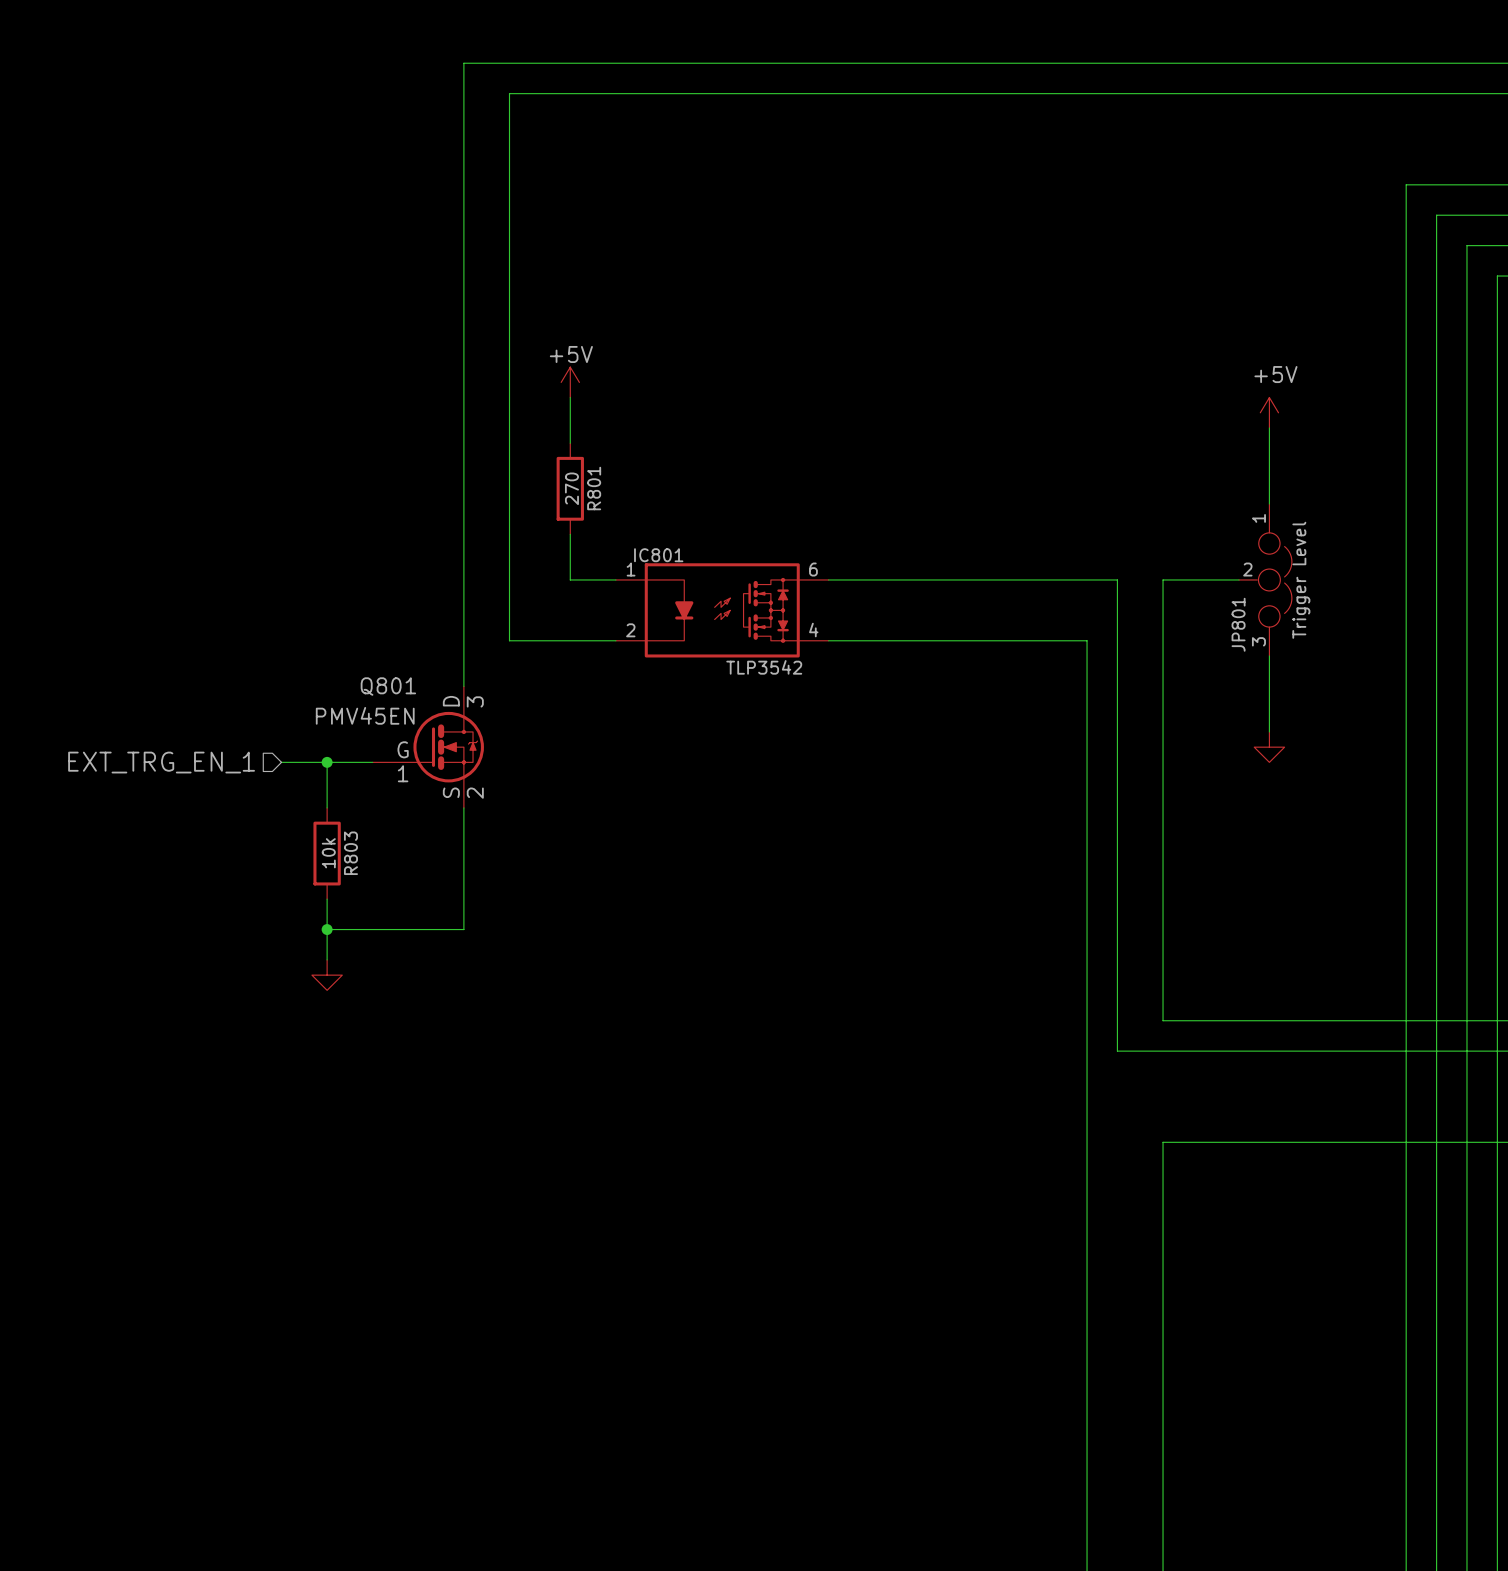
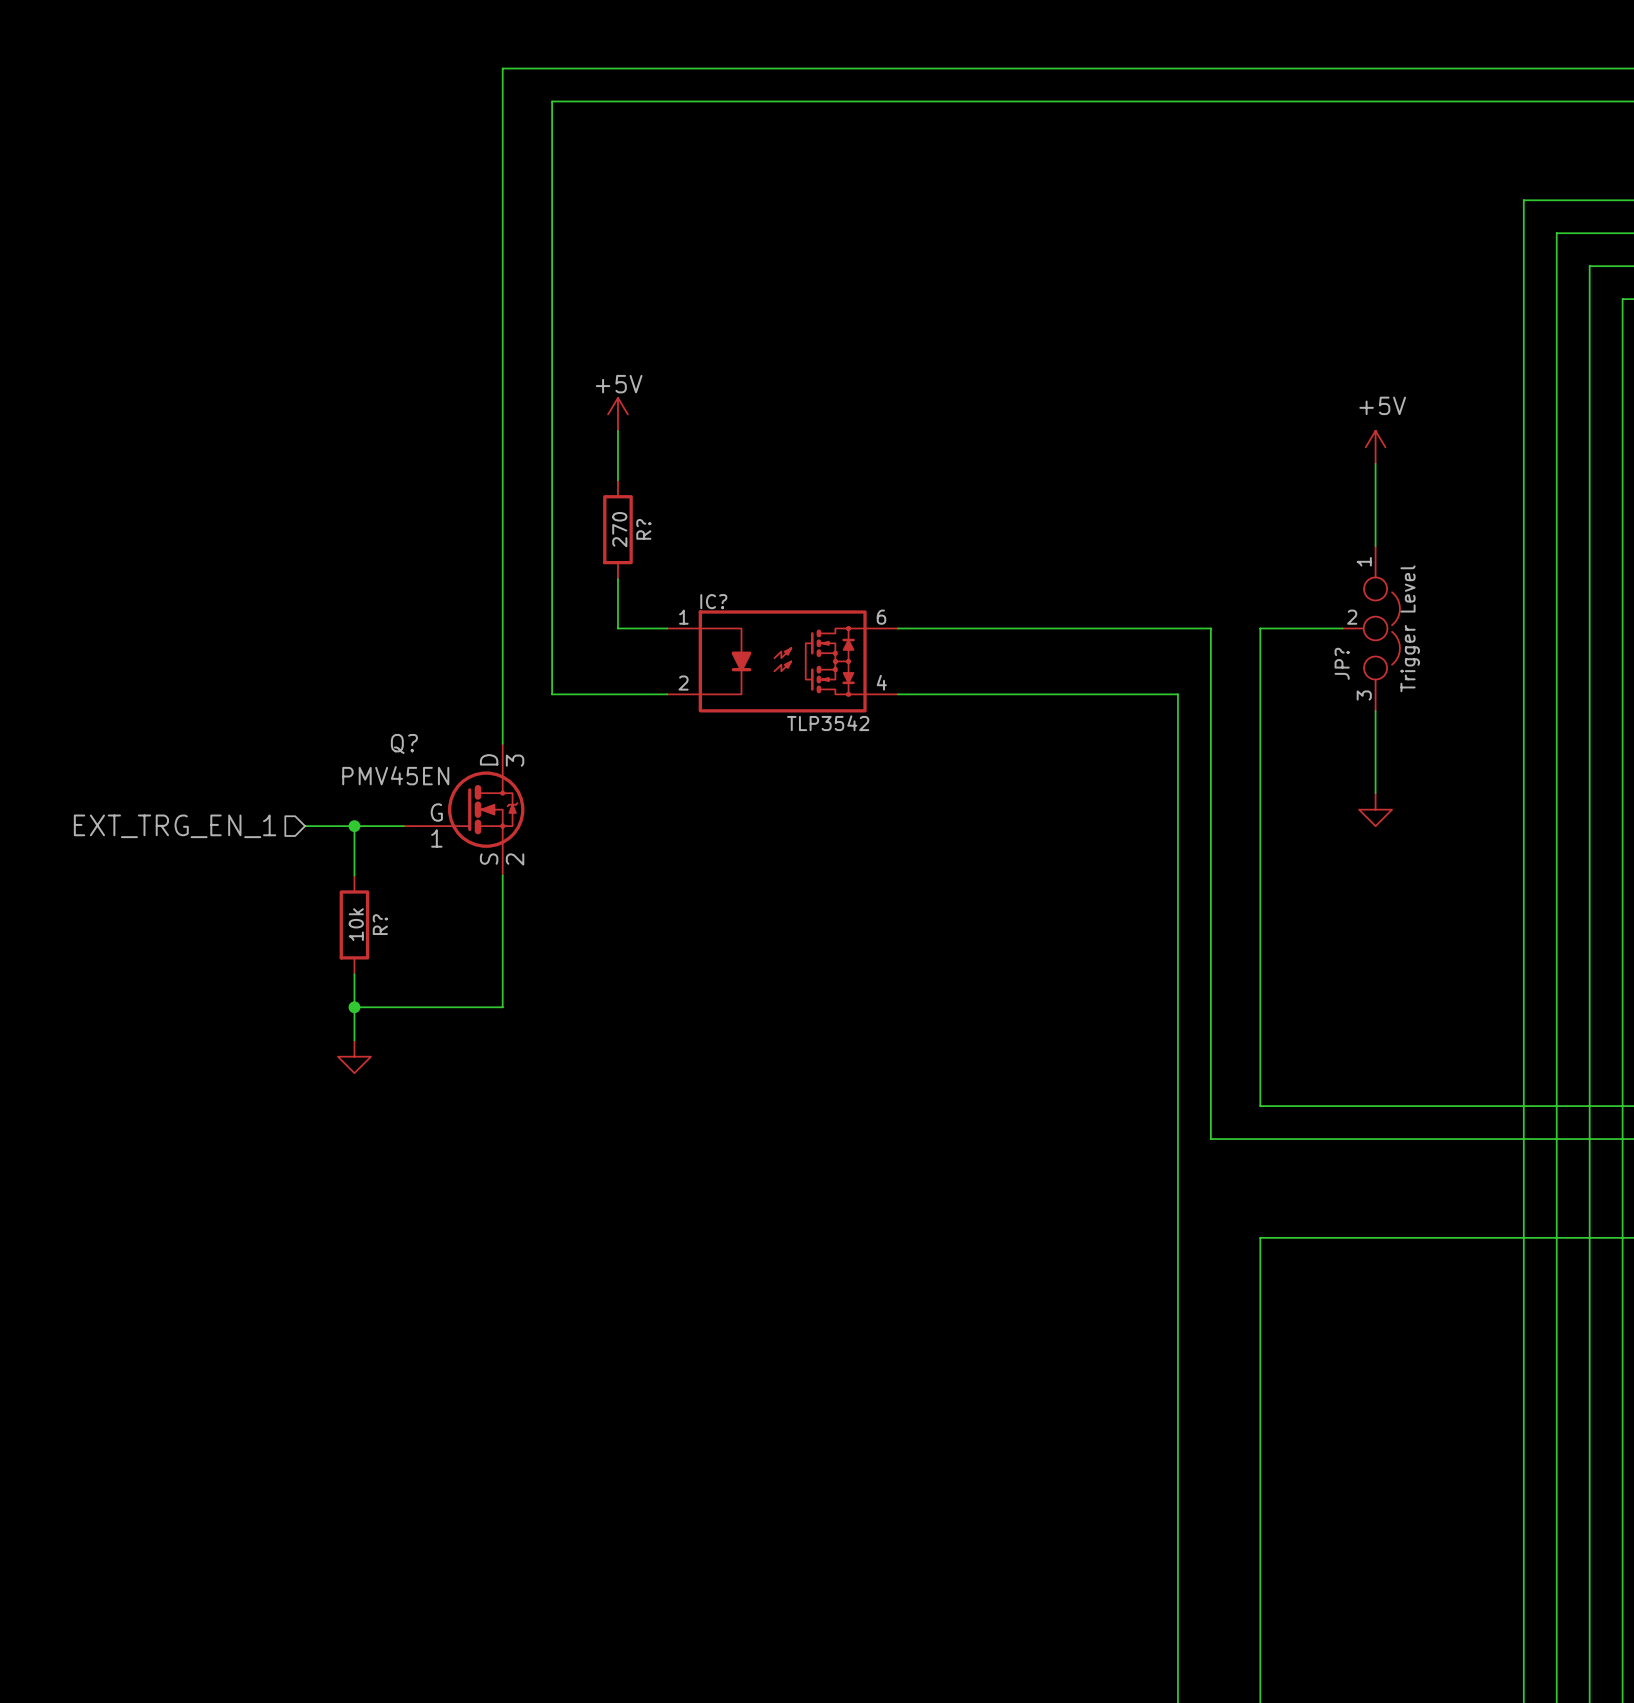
R801 name: R801 (594, 488) -> R? (643, 529)
IC801 name: IC801 (658, 555) -> IC? (713, 601)
JP801 name: JP801 (1238, 624) -> JP? (1342, 663)
Q801 name: Q801 (388, 686) -> Q? (404, 743)
R803 name: R803 (350, 853) -> R? (380, 924)

